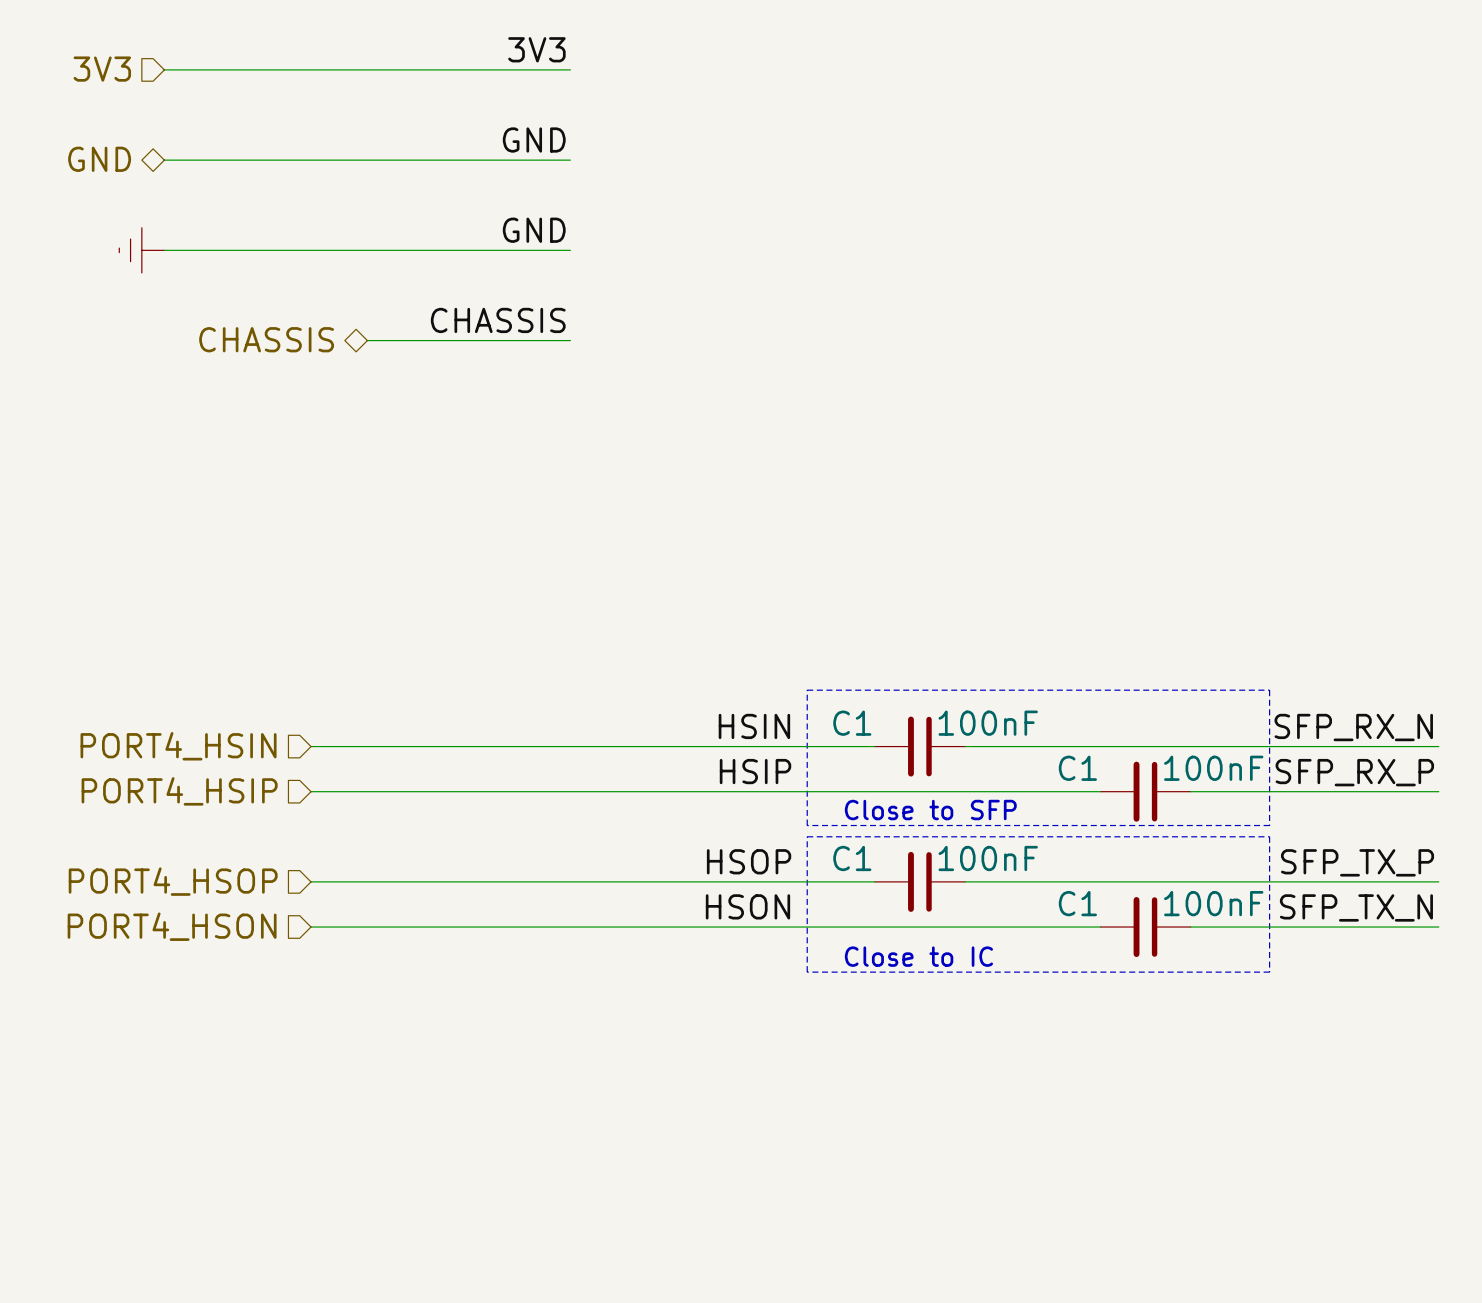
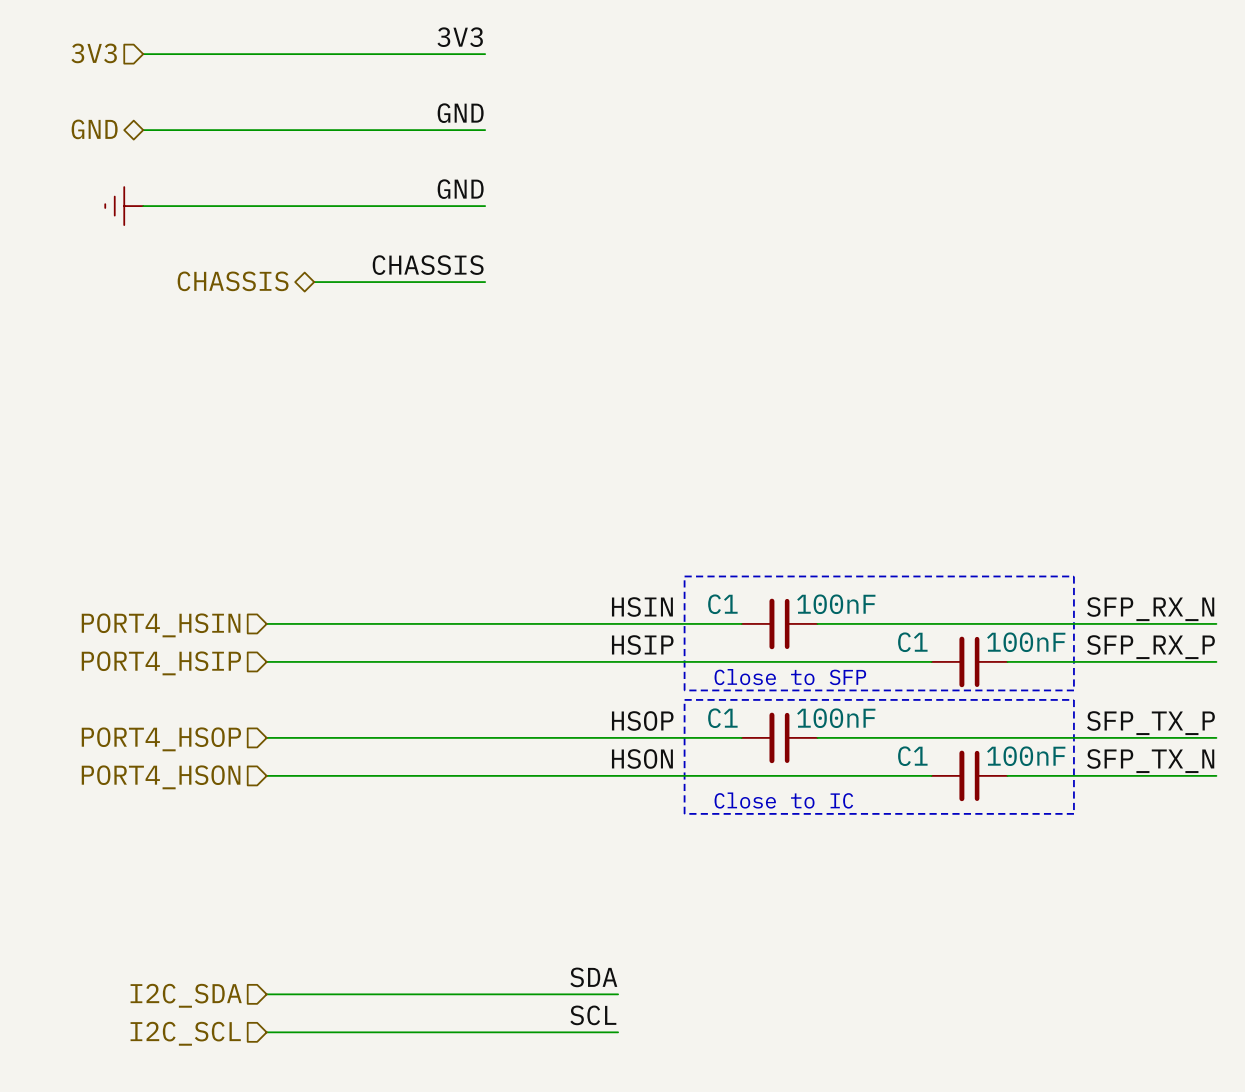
label: none -> SDA (593, 977)
hierarchical label: none -> I2C_SDA (186, 995)
wire: none -> (266, 994) (618, 994)
label: none -> SCL (593, 1015)
hierarchical label: none -> I2C_SCL (185, 1033)
wire: none -> (266, 1032) (618, 1032)

